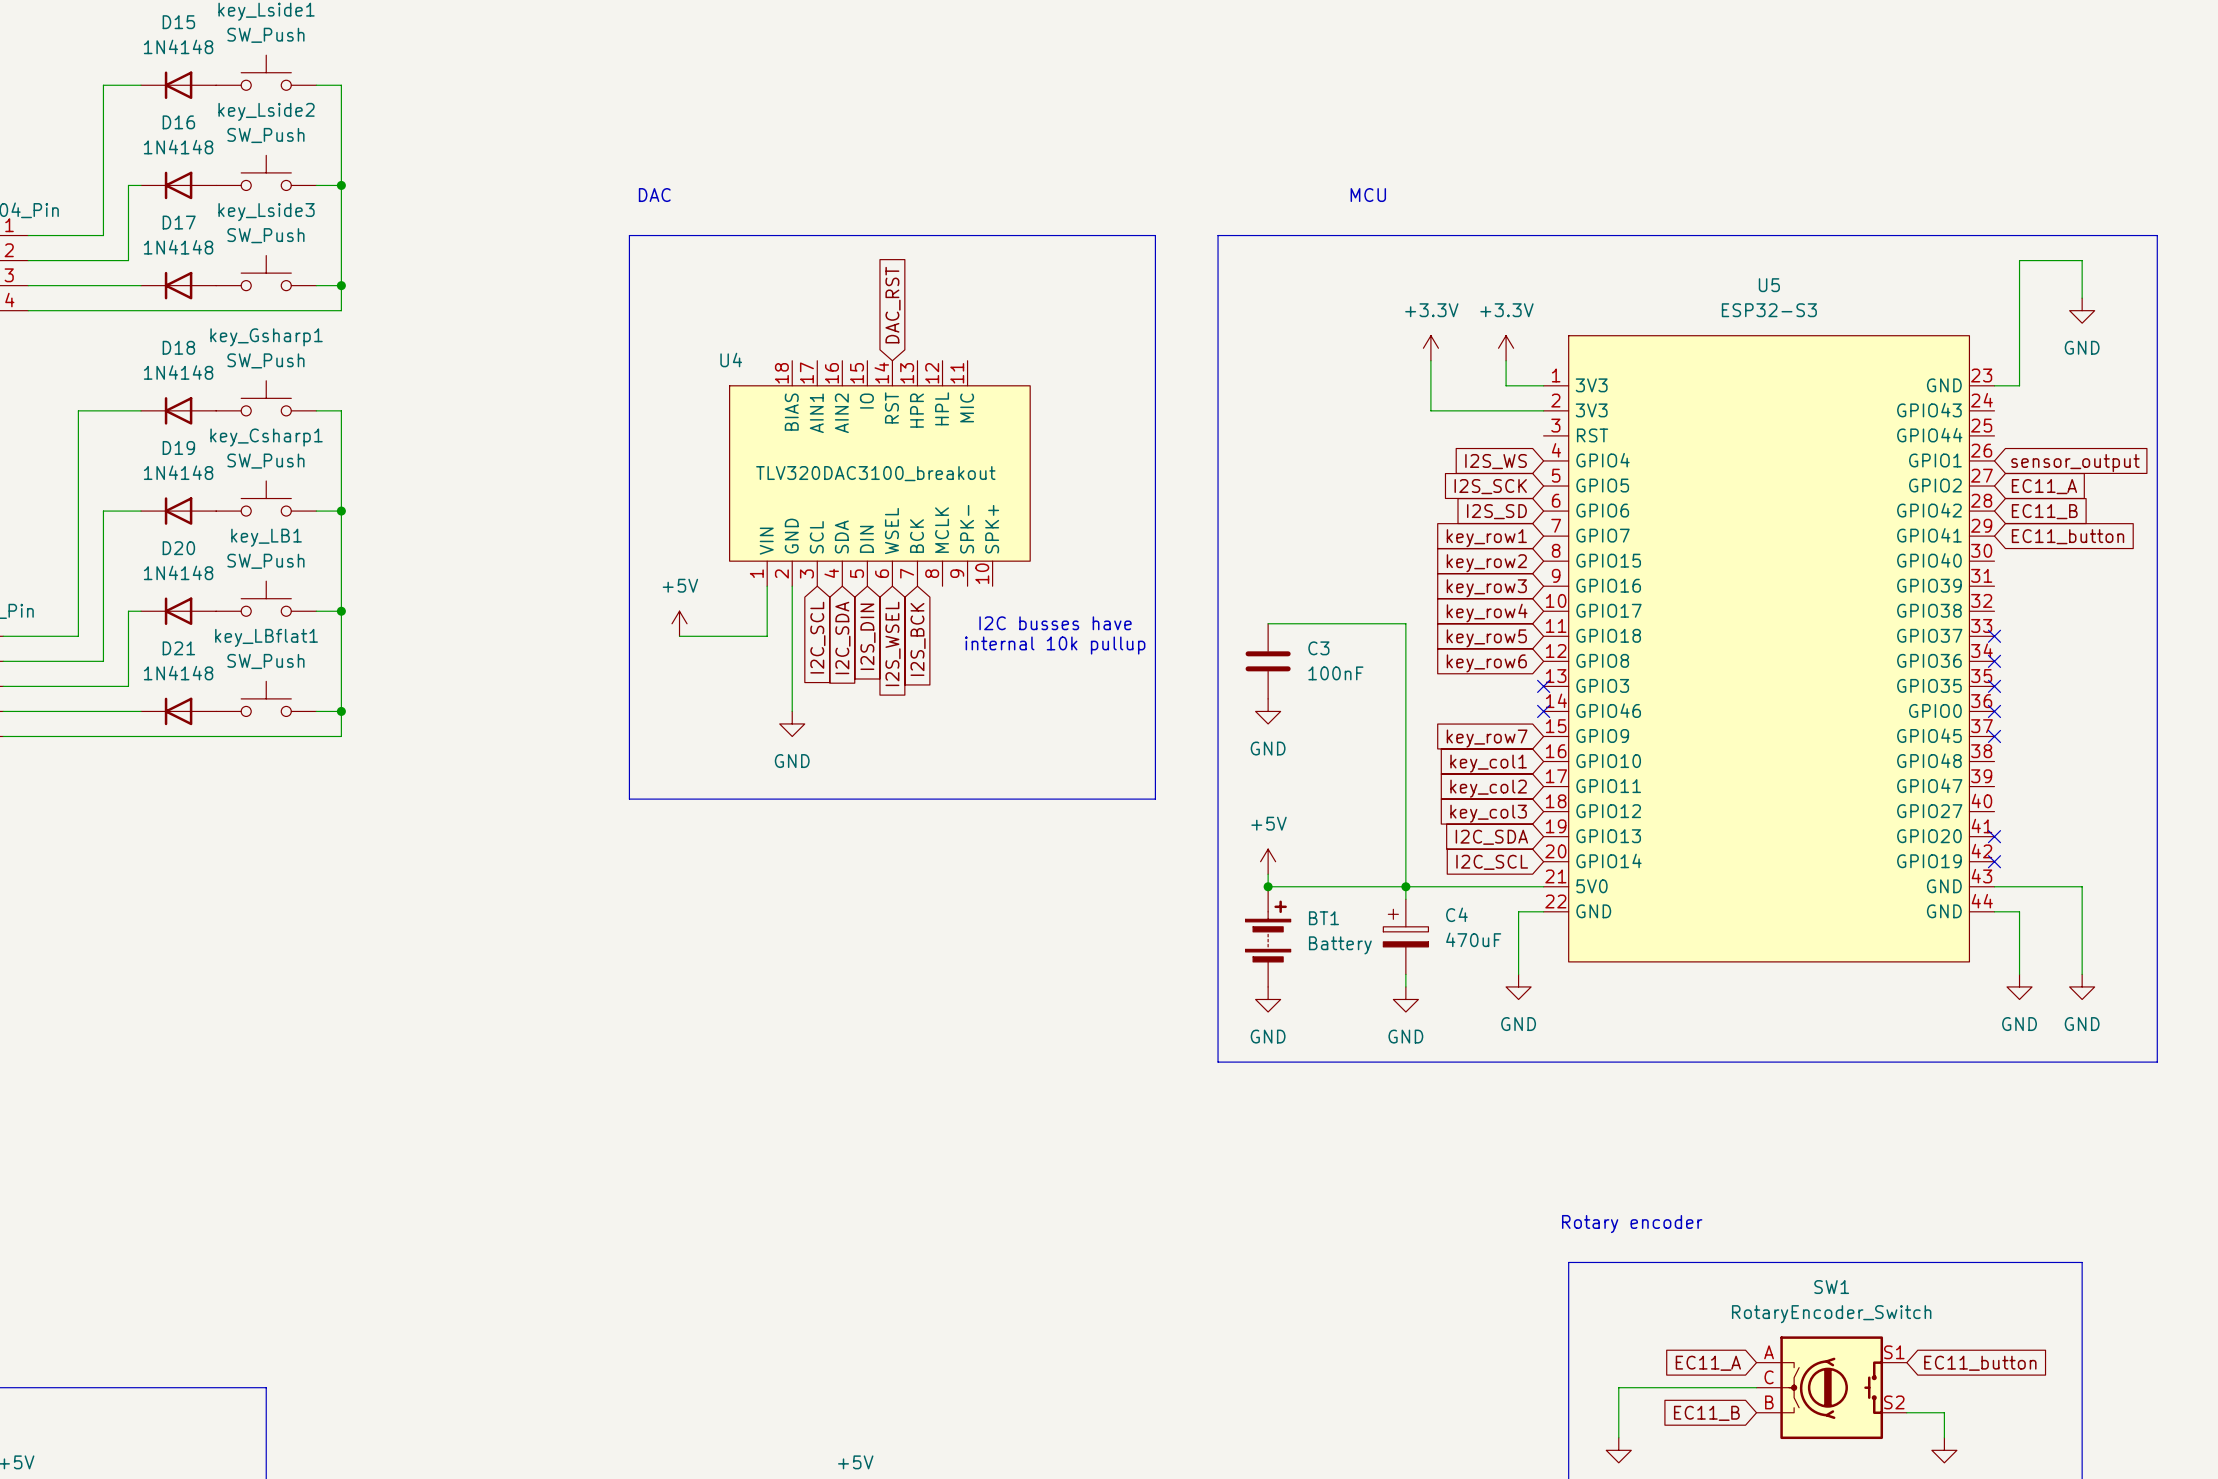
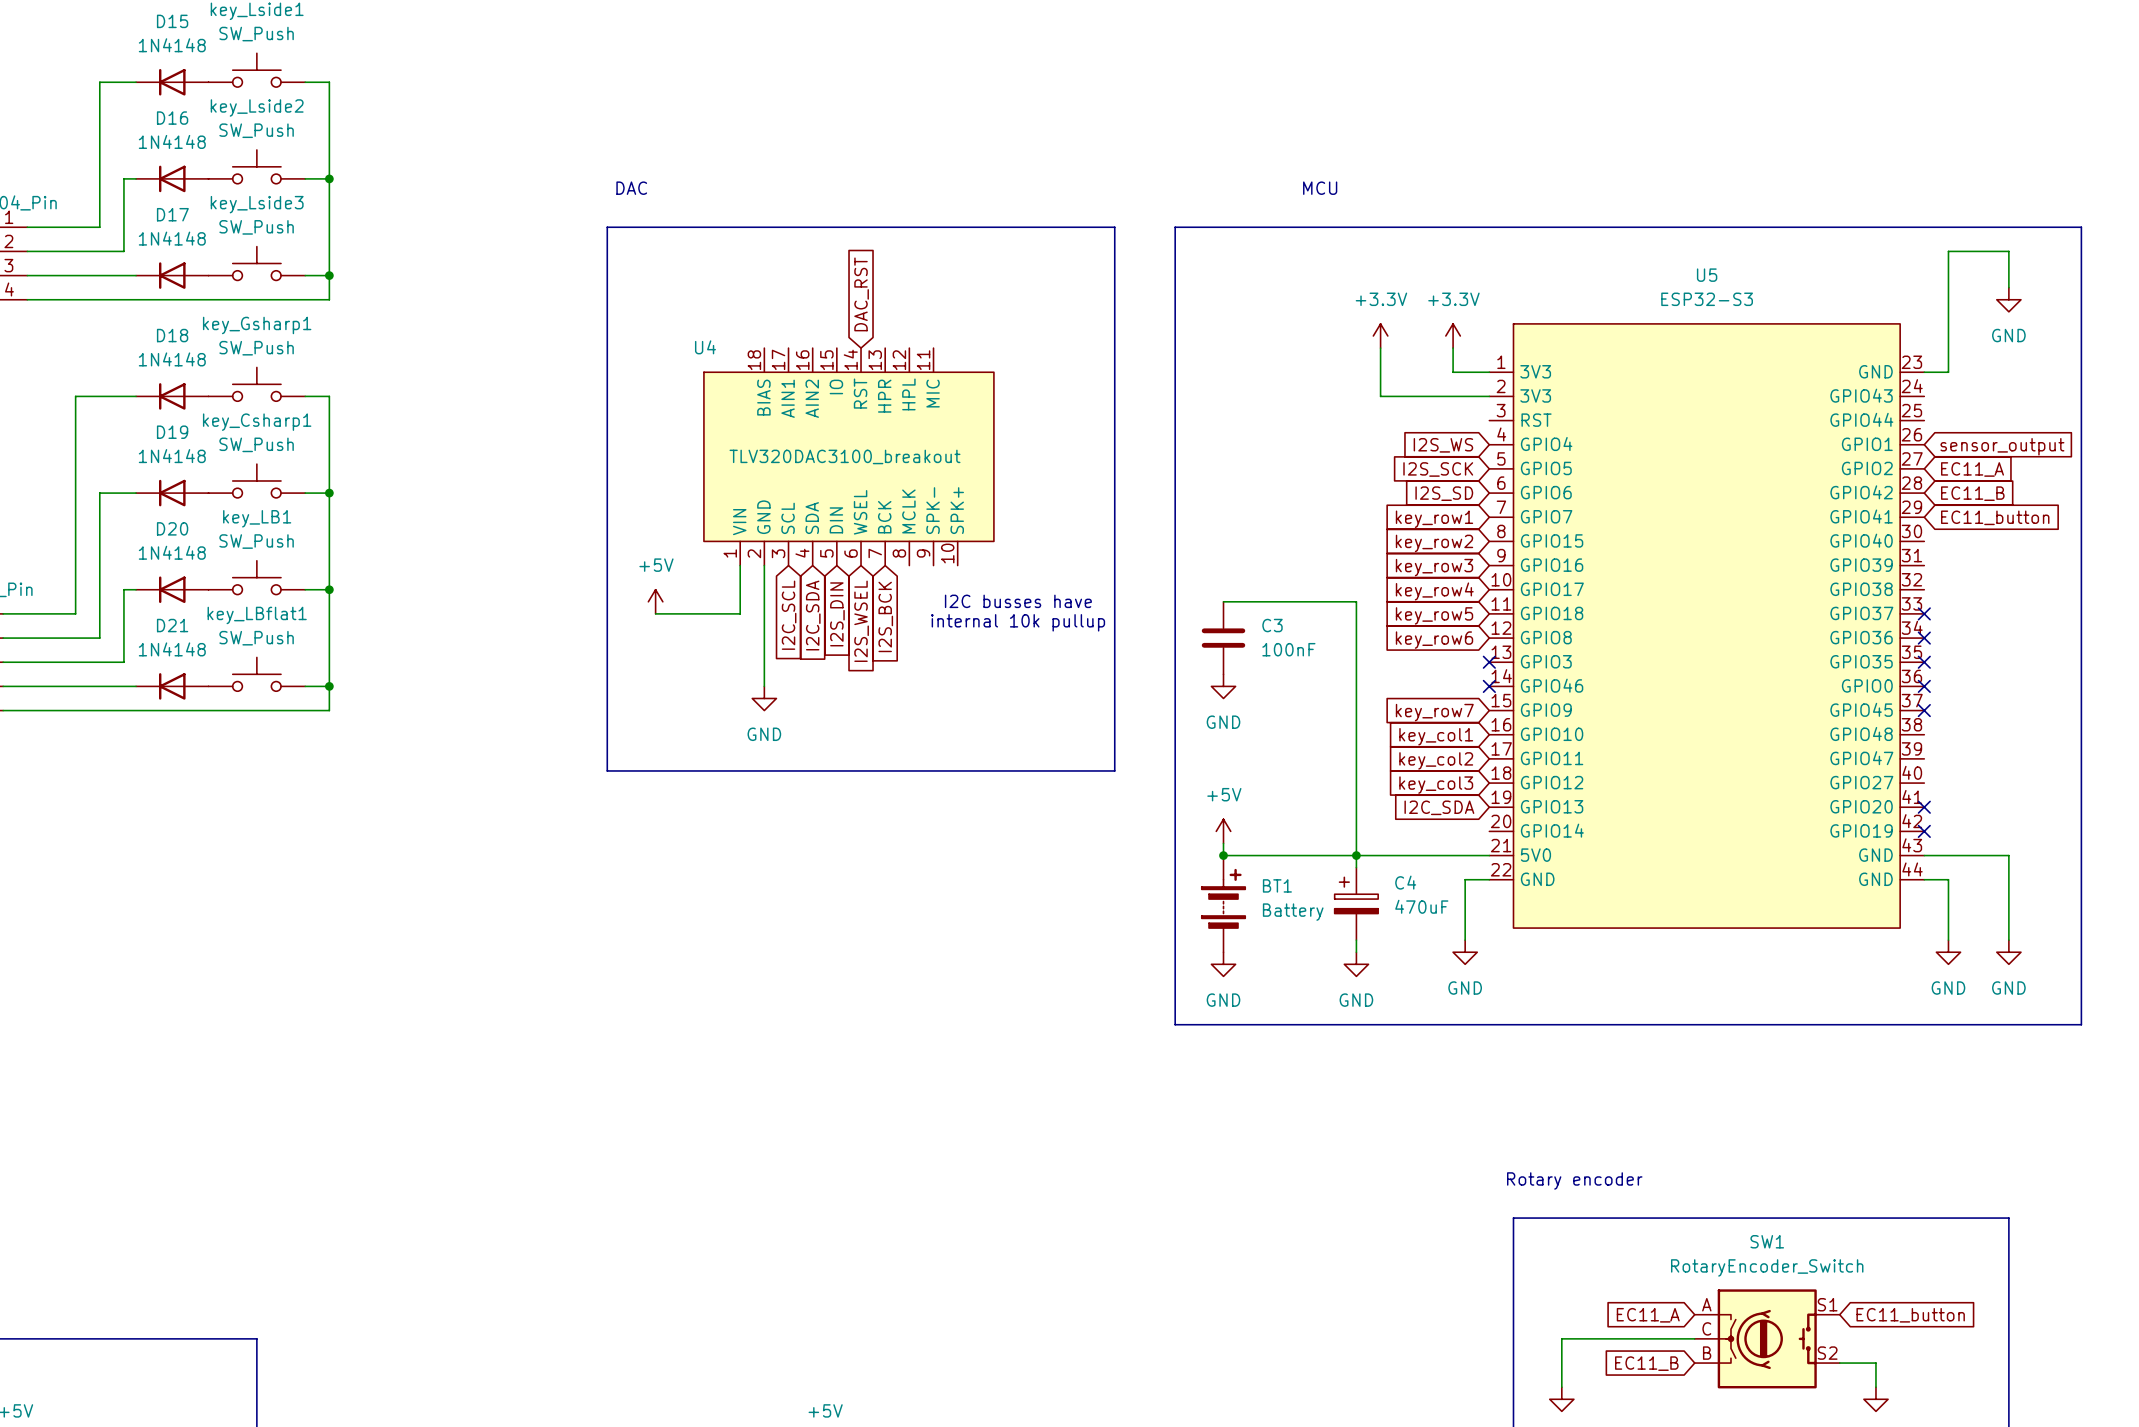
global label: I2C_SCL (1492, 862) -> none

